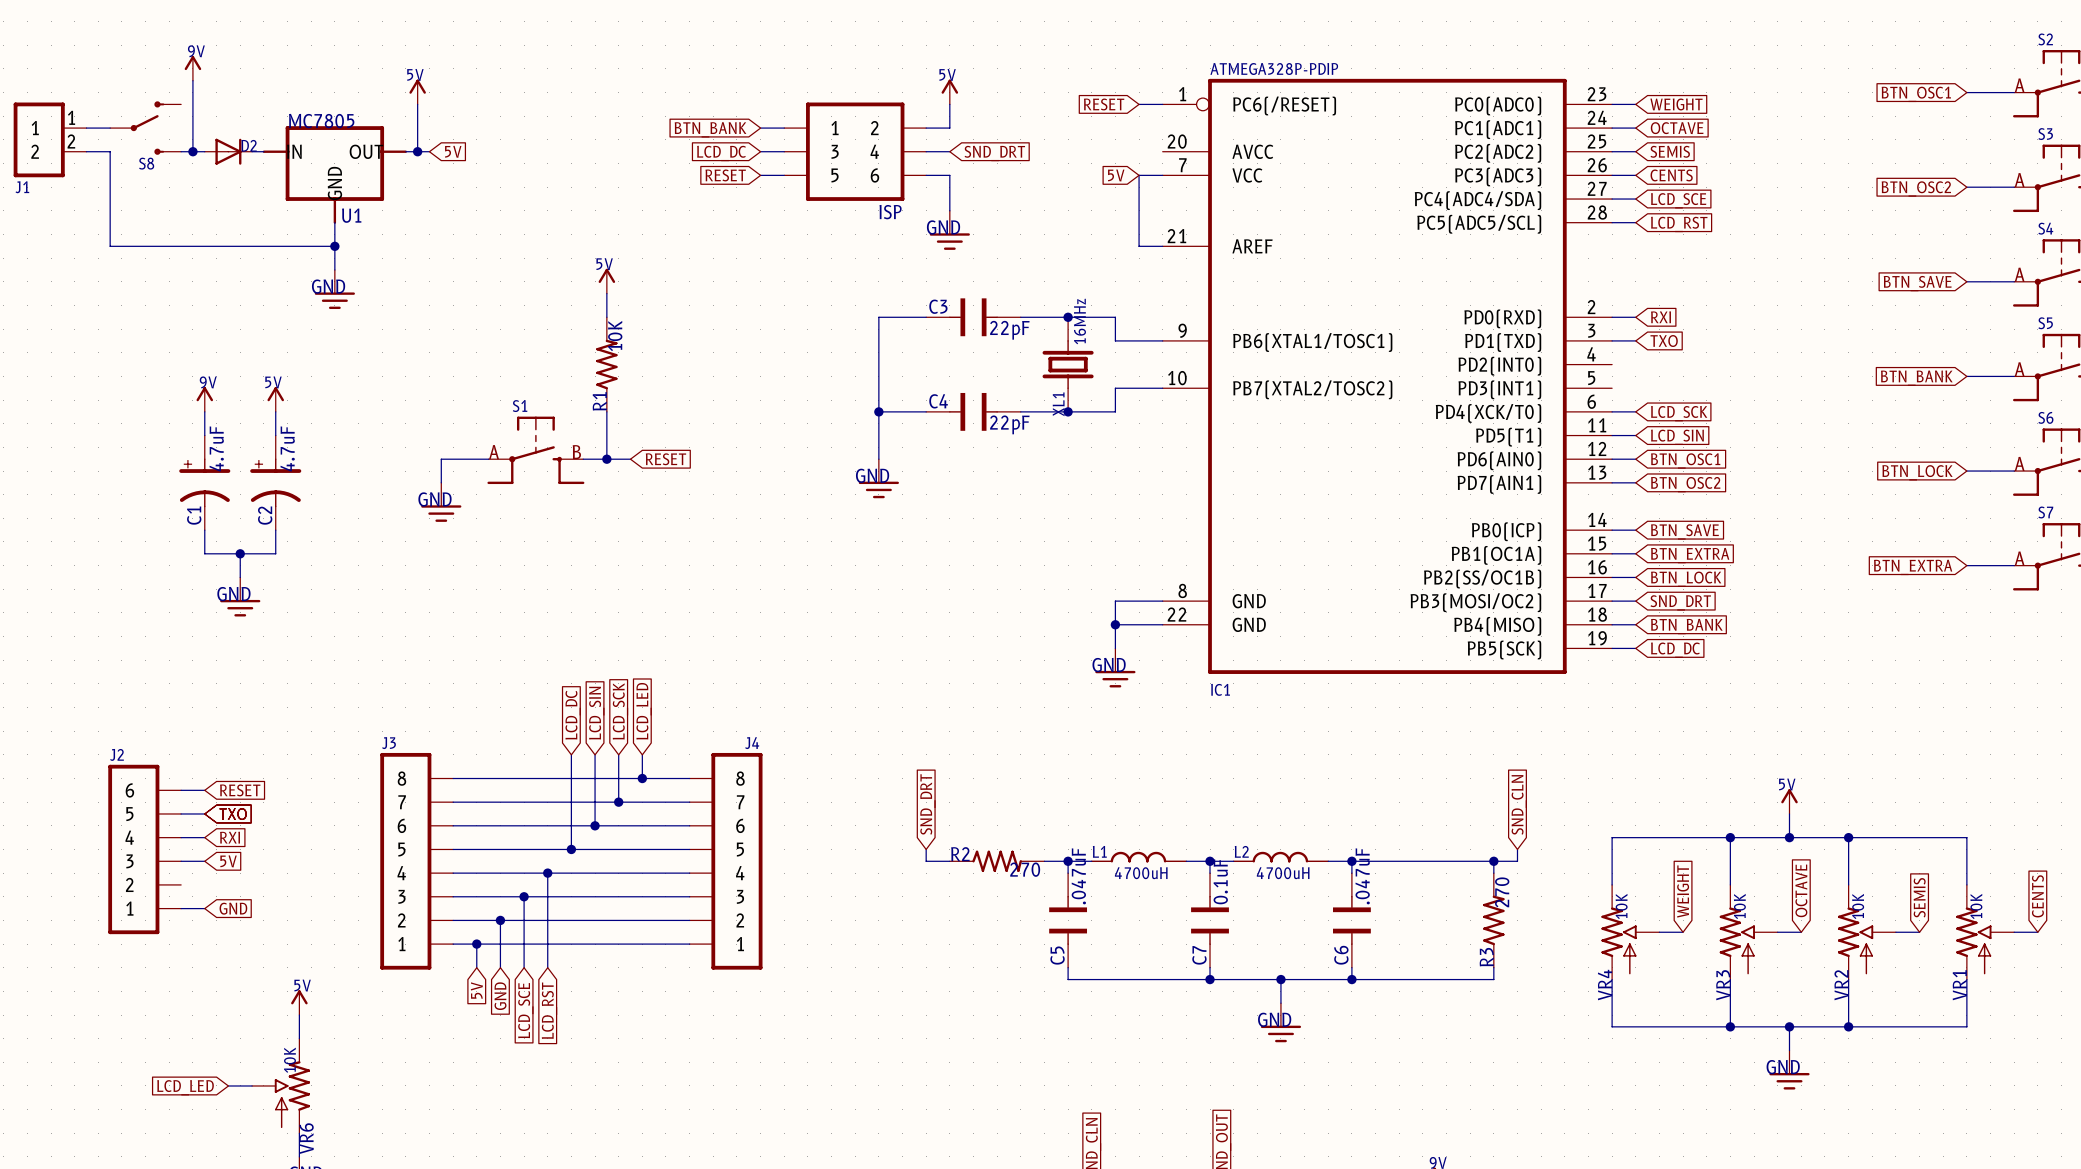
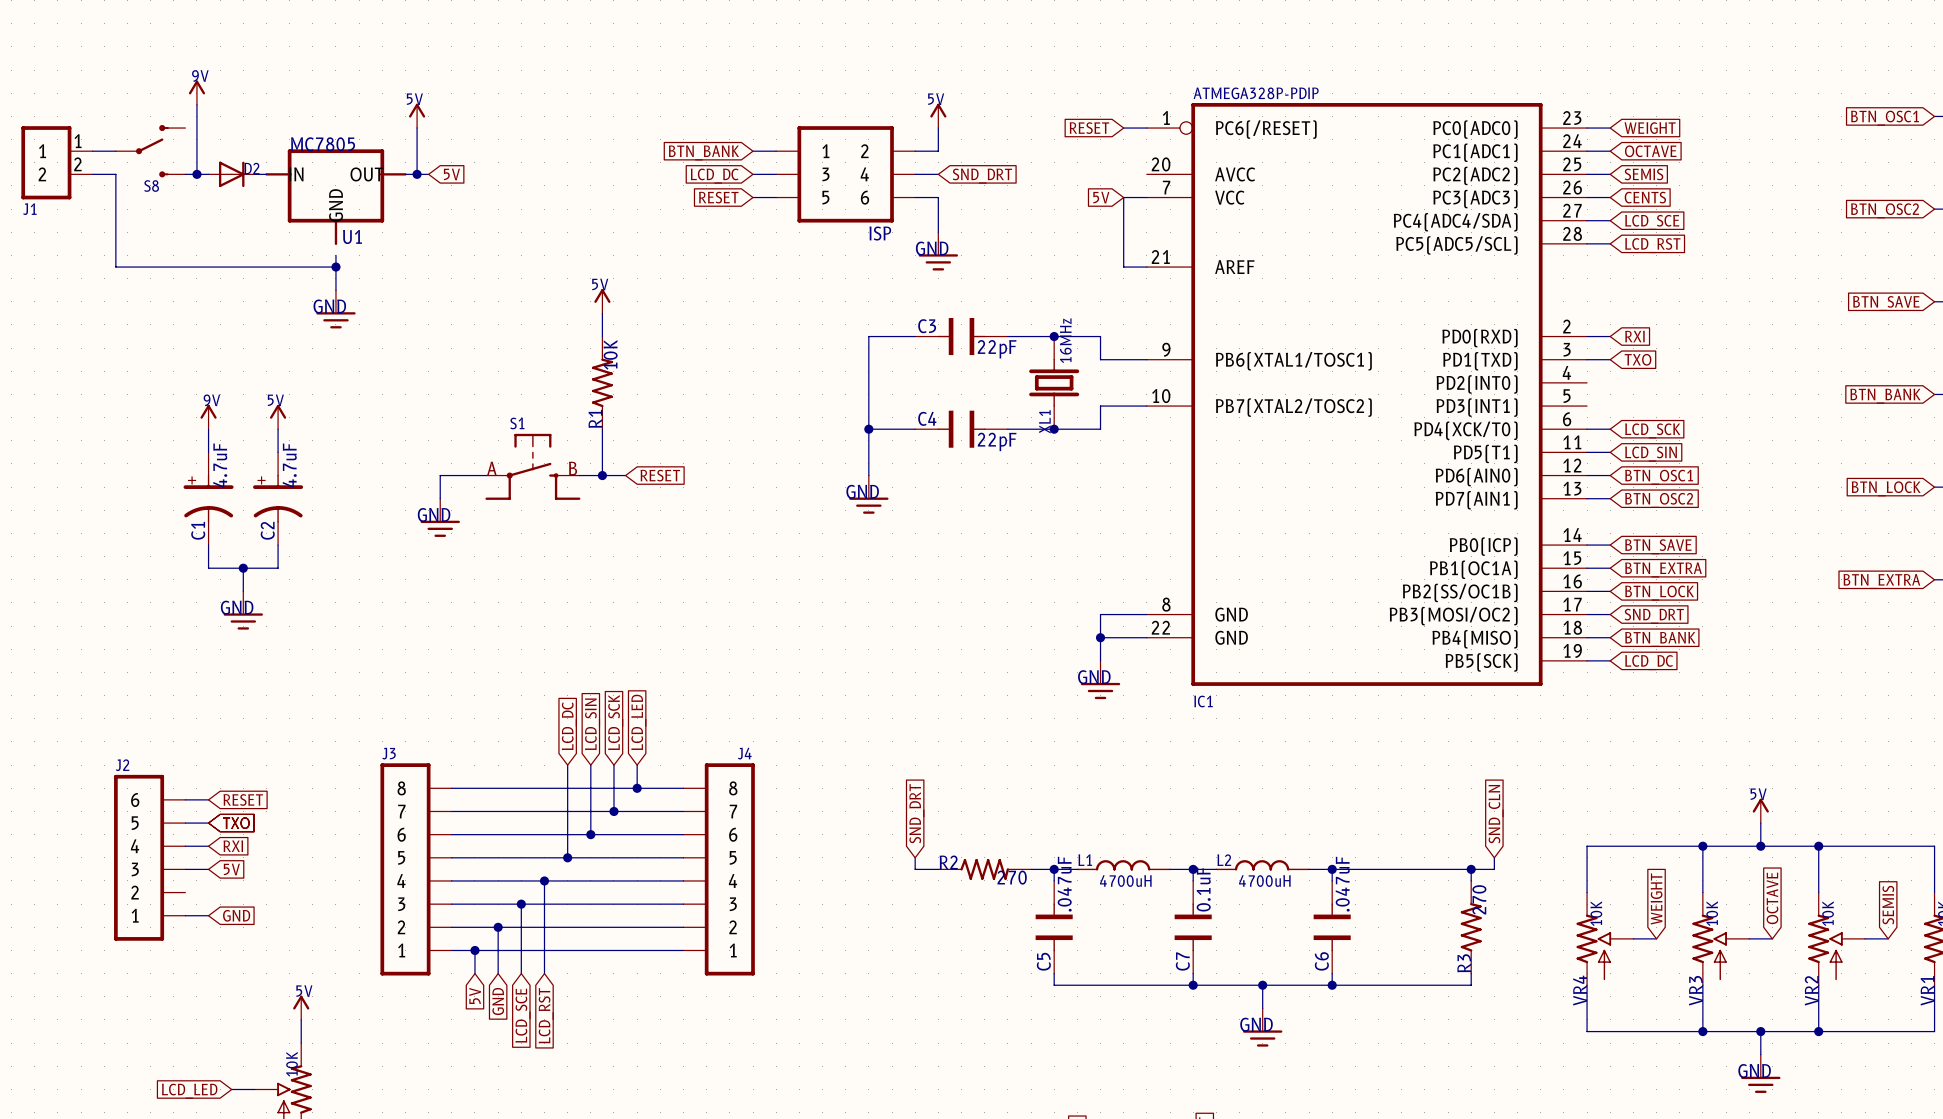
wire: (334, 222) (334, 234) -> none

